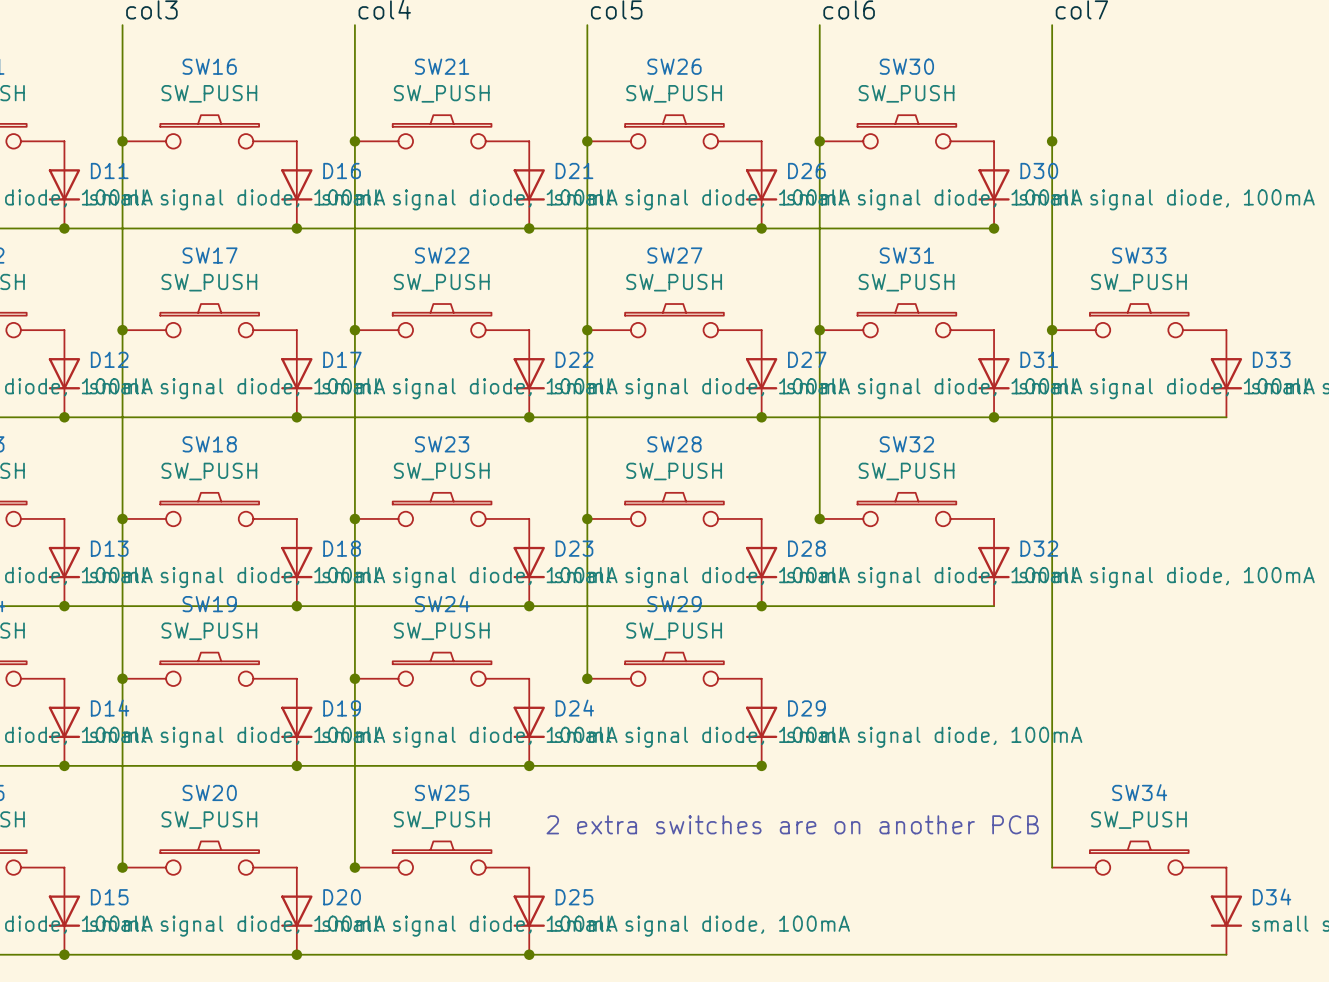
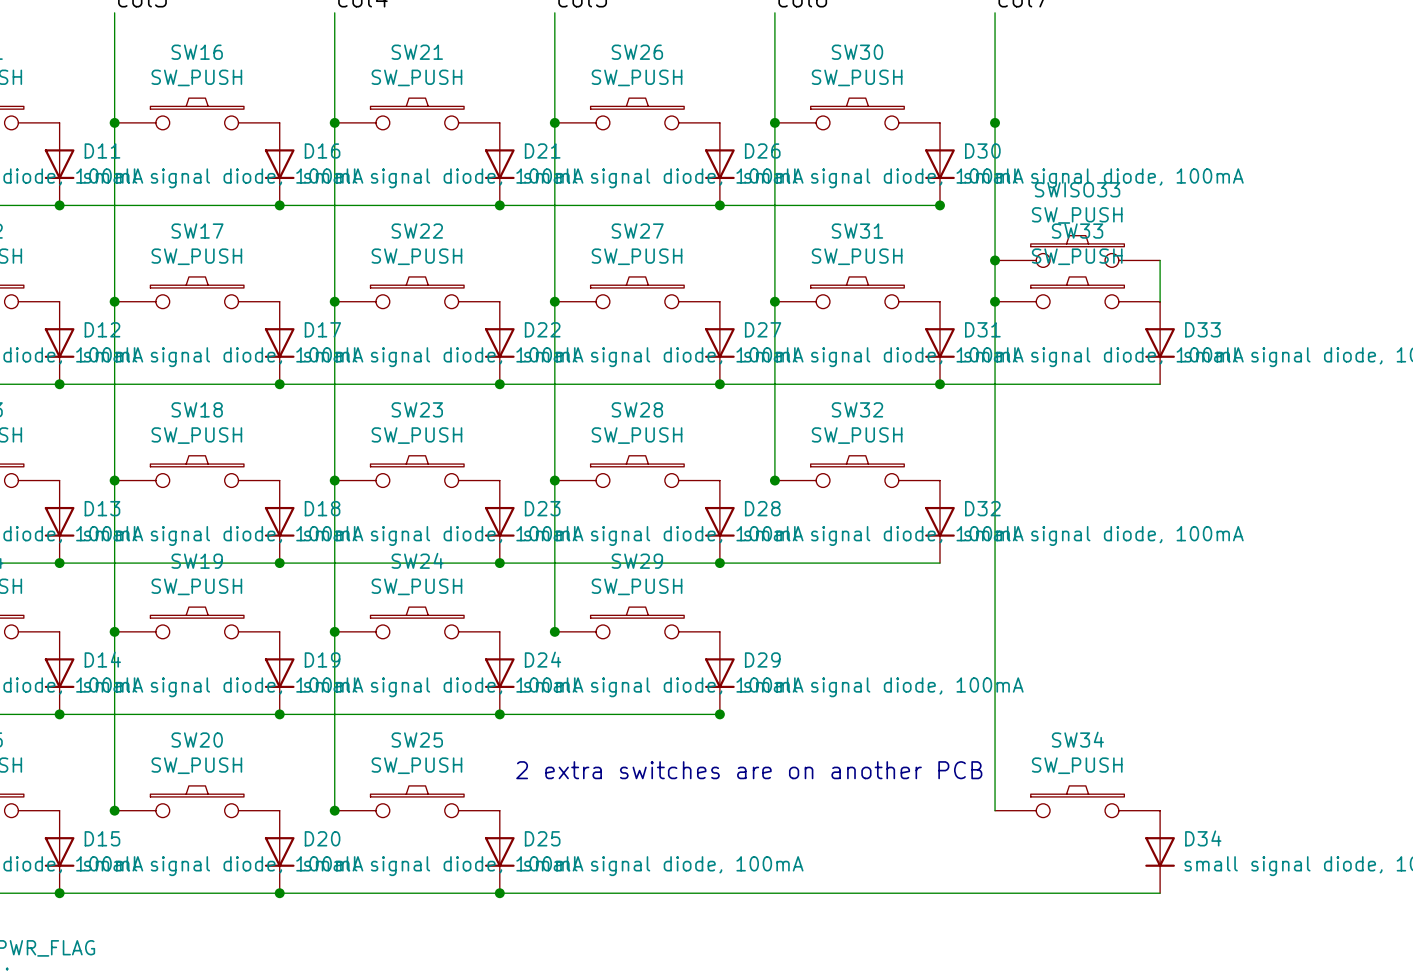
SWISO33: none -> SW_PUSH (1077, 251)
junction: none -> (995, 260)
wire: none -> (1160, 260) (1160, 301)

